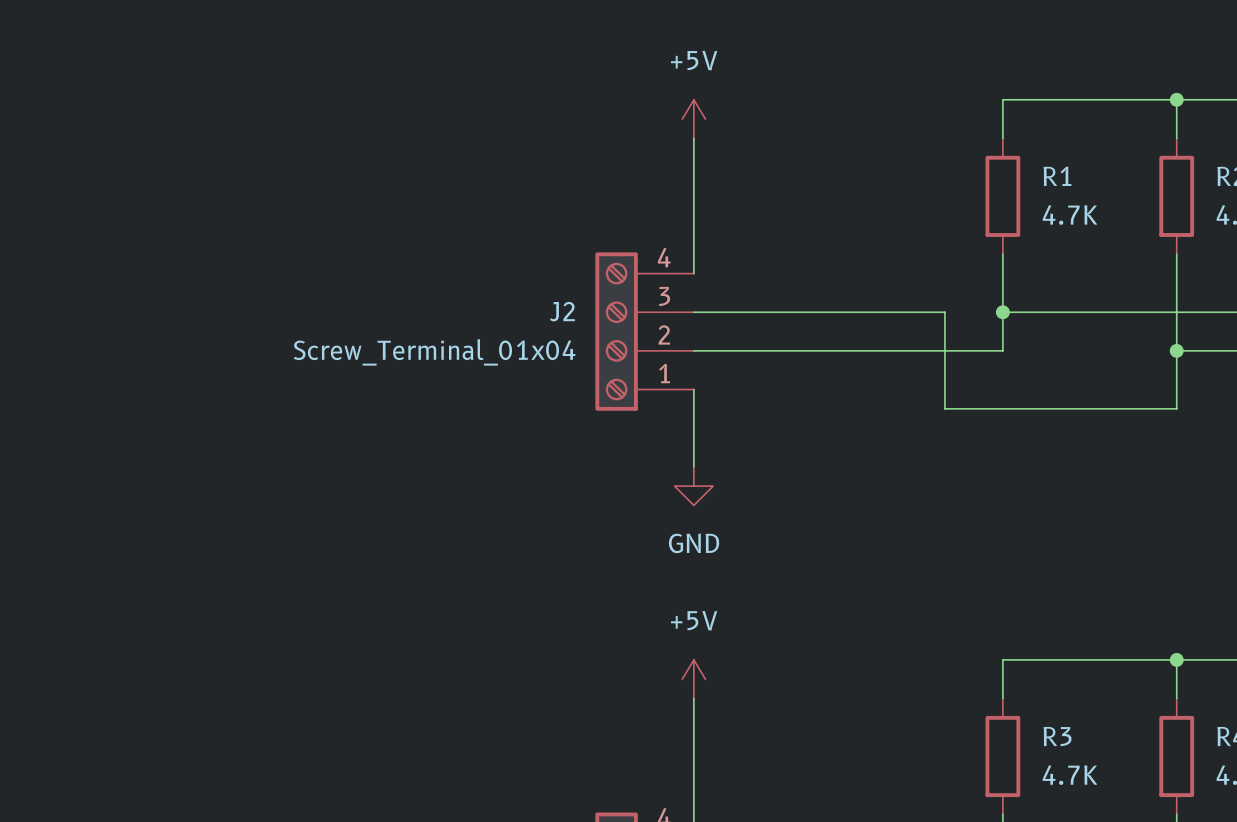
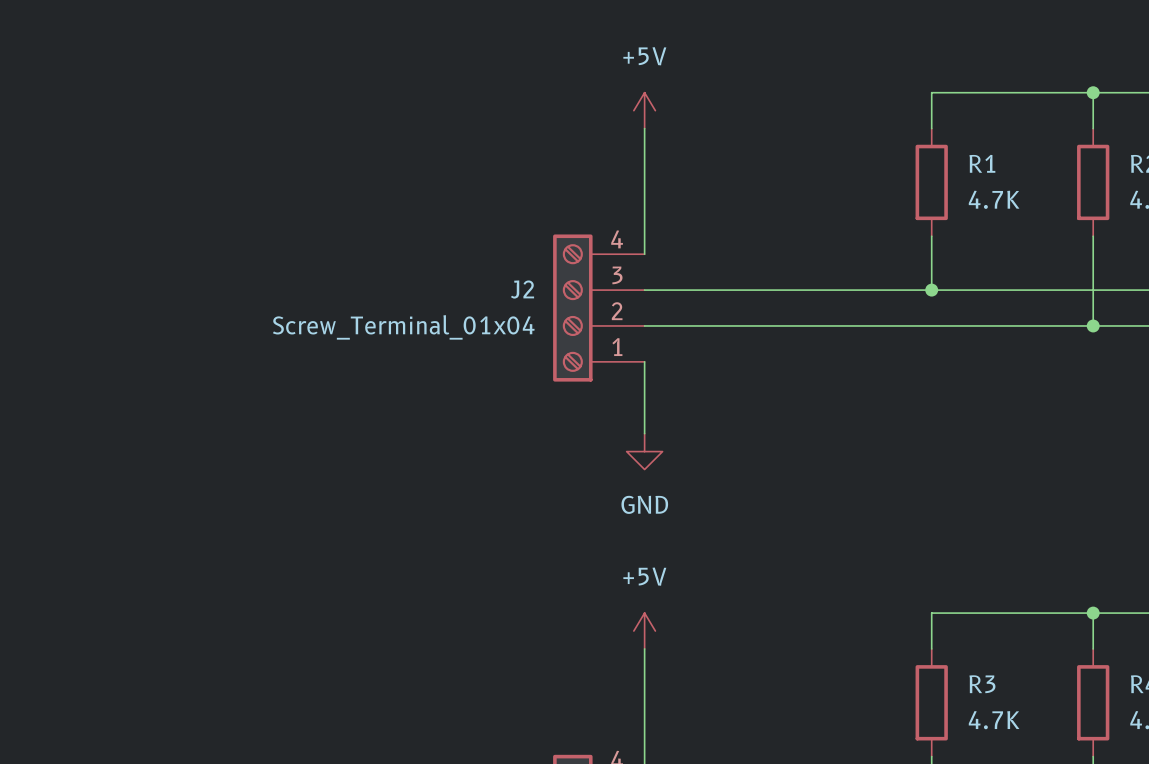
wire: (944, 312) (944, 408) (1176, 408) (1176, 350) -> (931, 325) (1093, 325)
wire: (1002, 312) (1002, 350) -> (931, 290) (877, 290)

